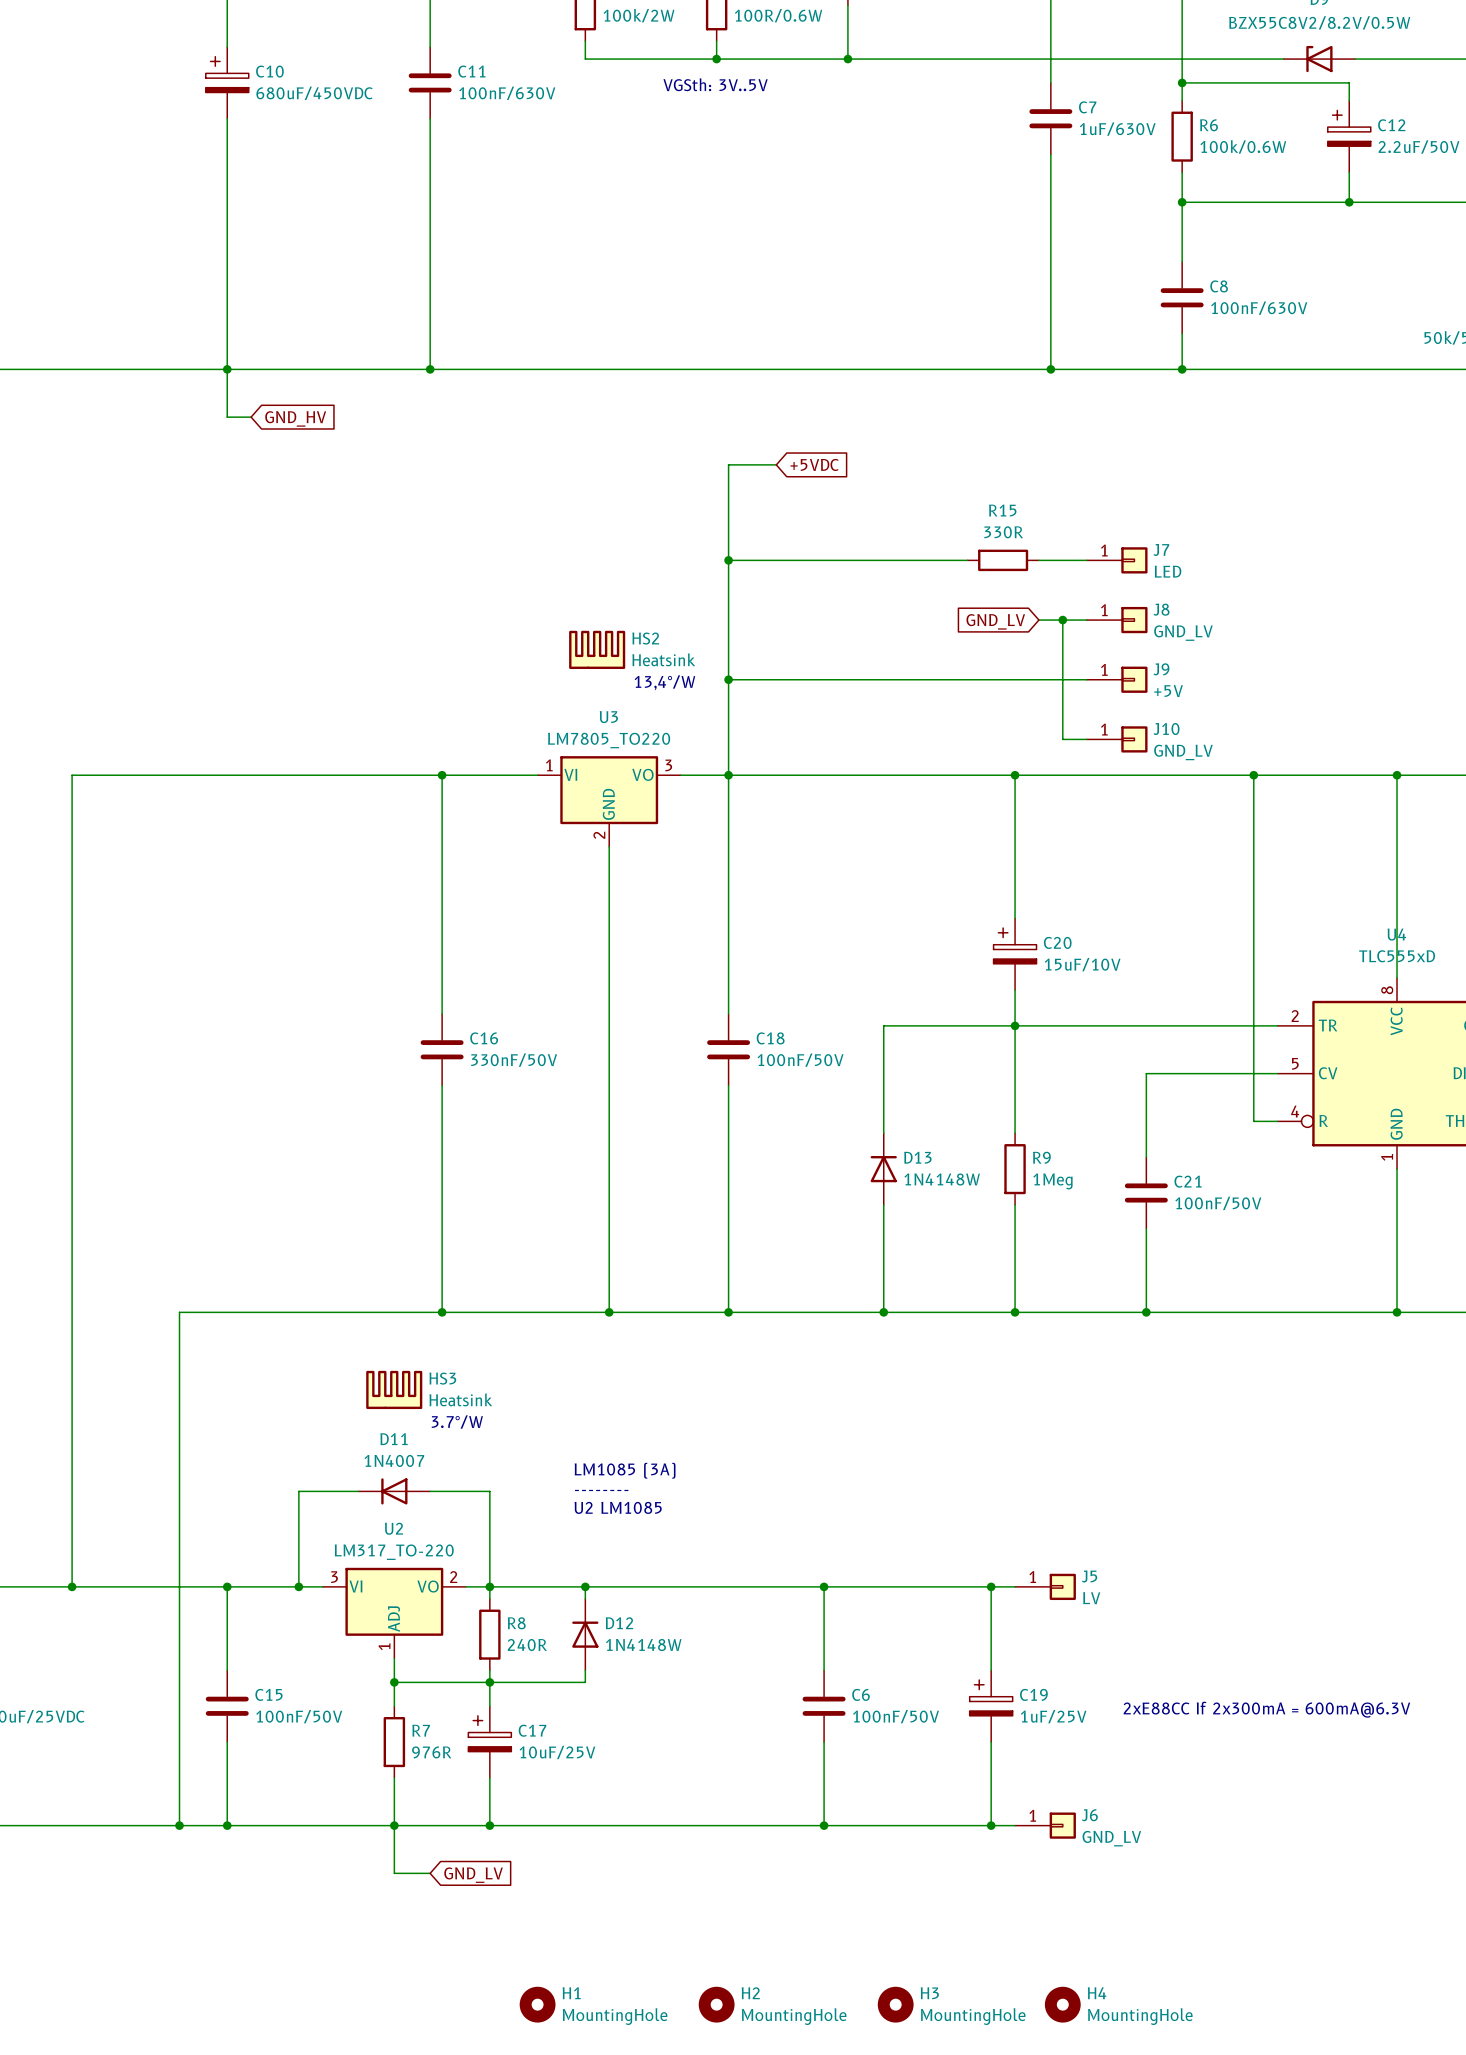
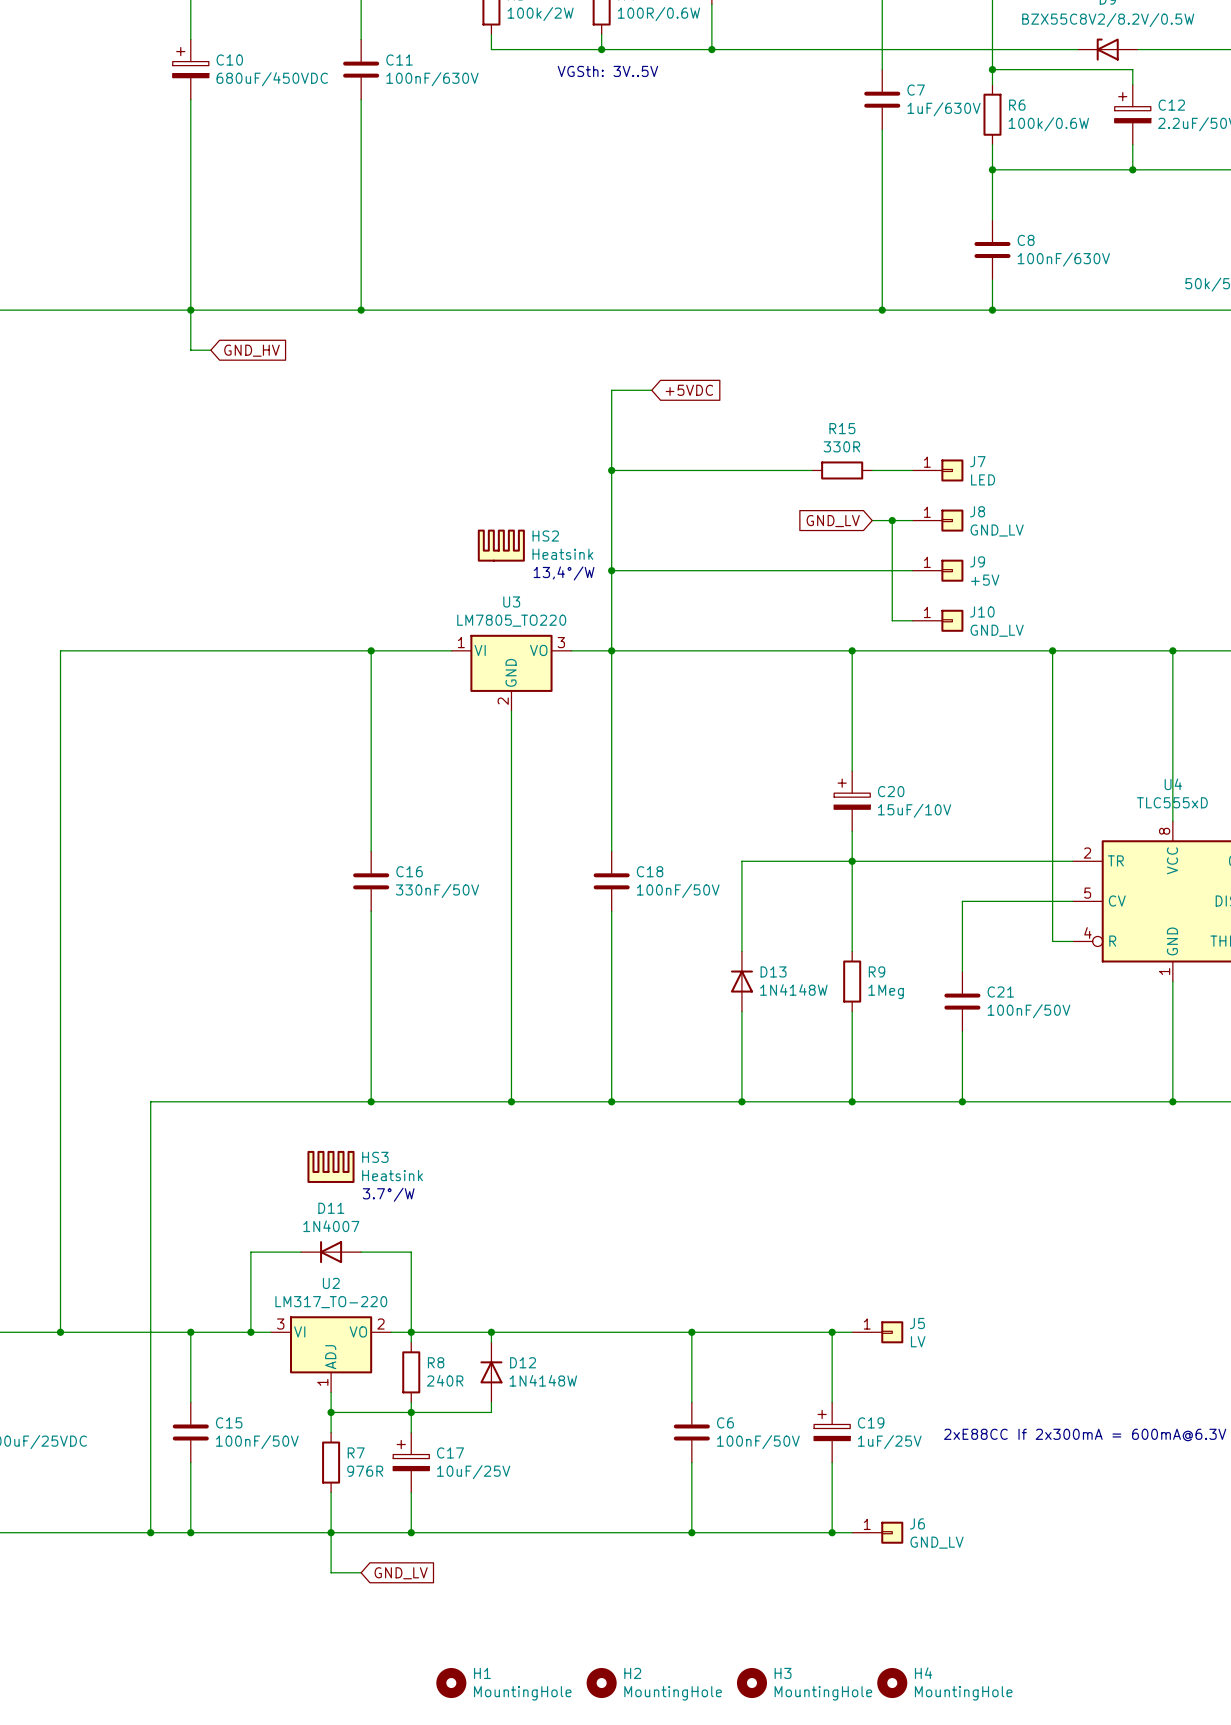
text: LM1085 (3A) (625, 1470) -> none
text: -------- (601, 1490) -> none
text: U2 LM1085 (618, 1507) -> none

